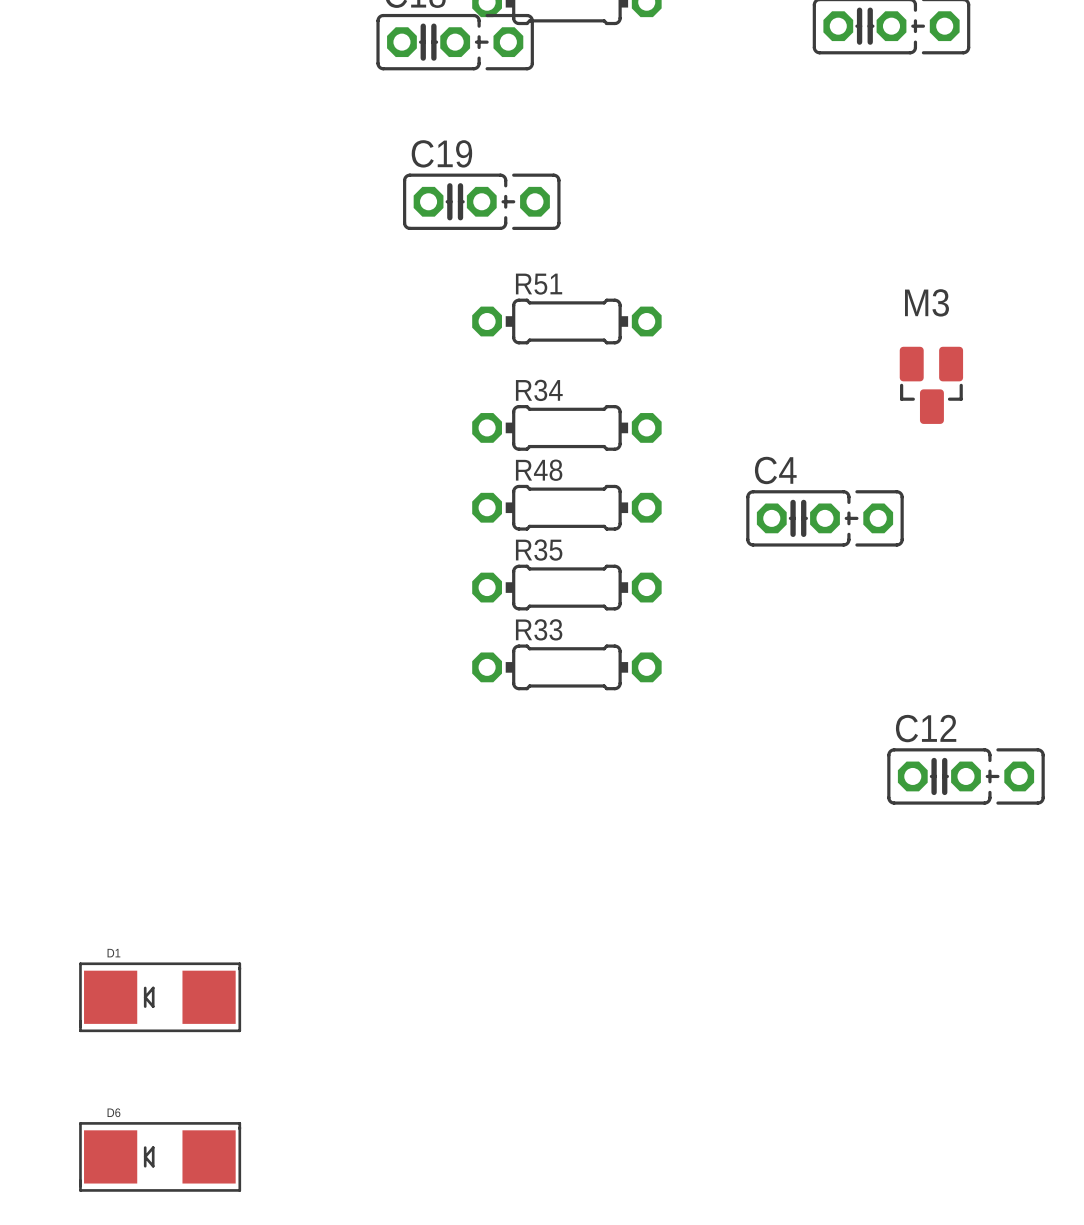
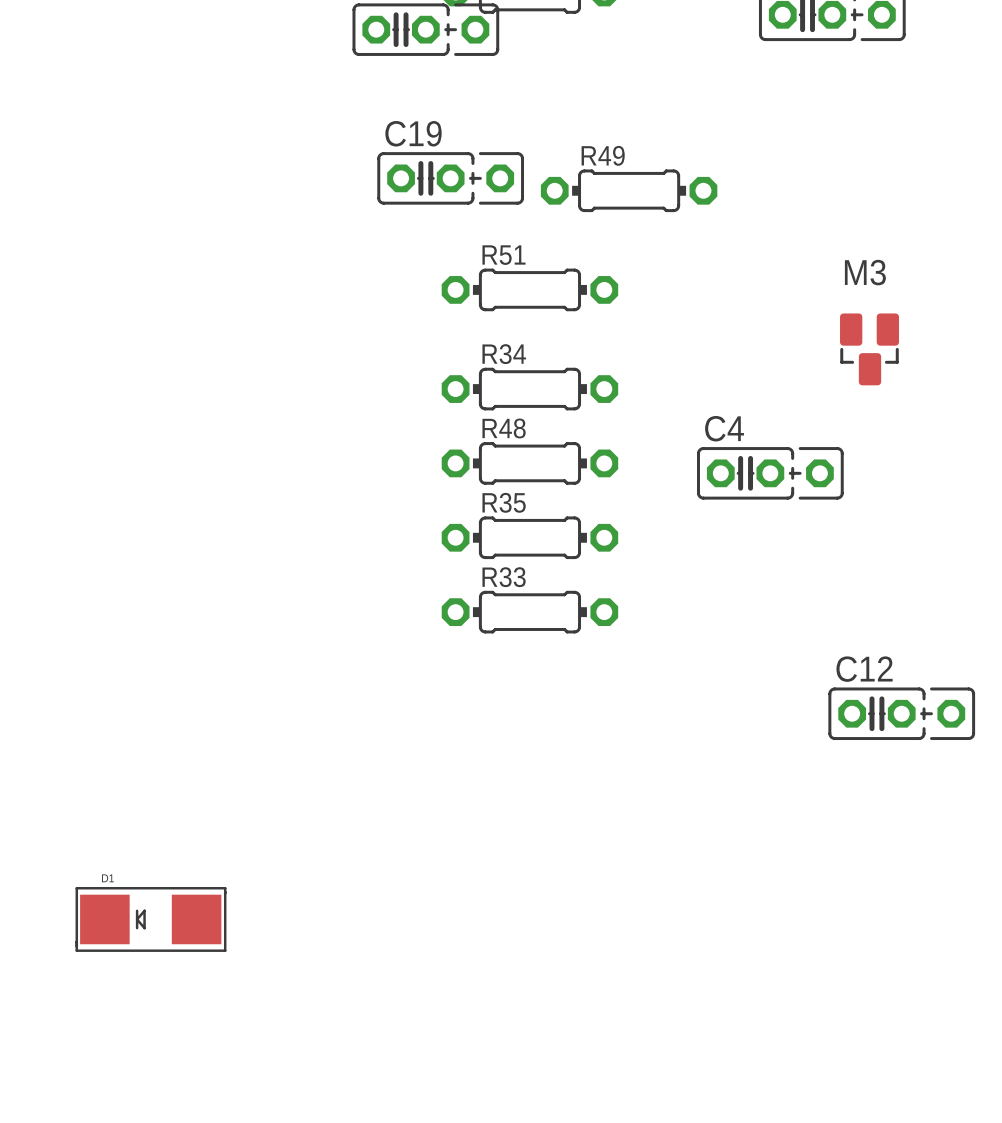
R49: none -> (629, 190)
D6: (160, 1156) -> none

